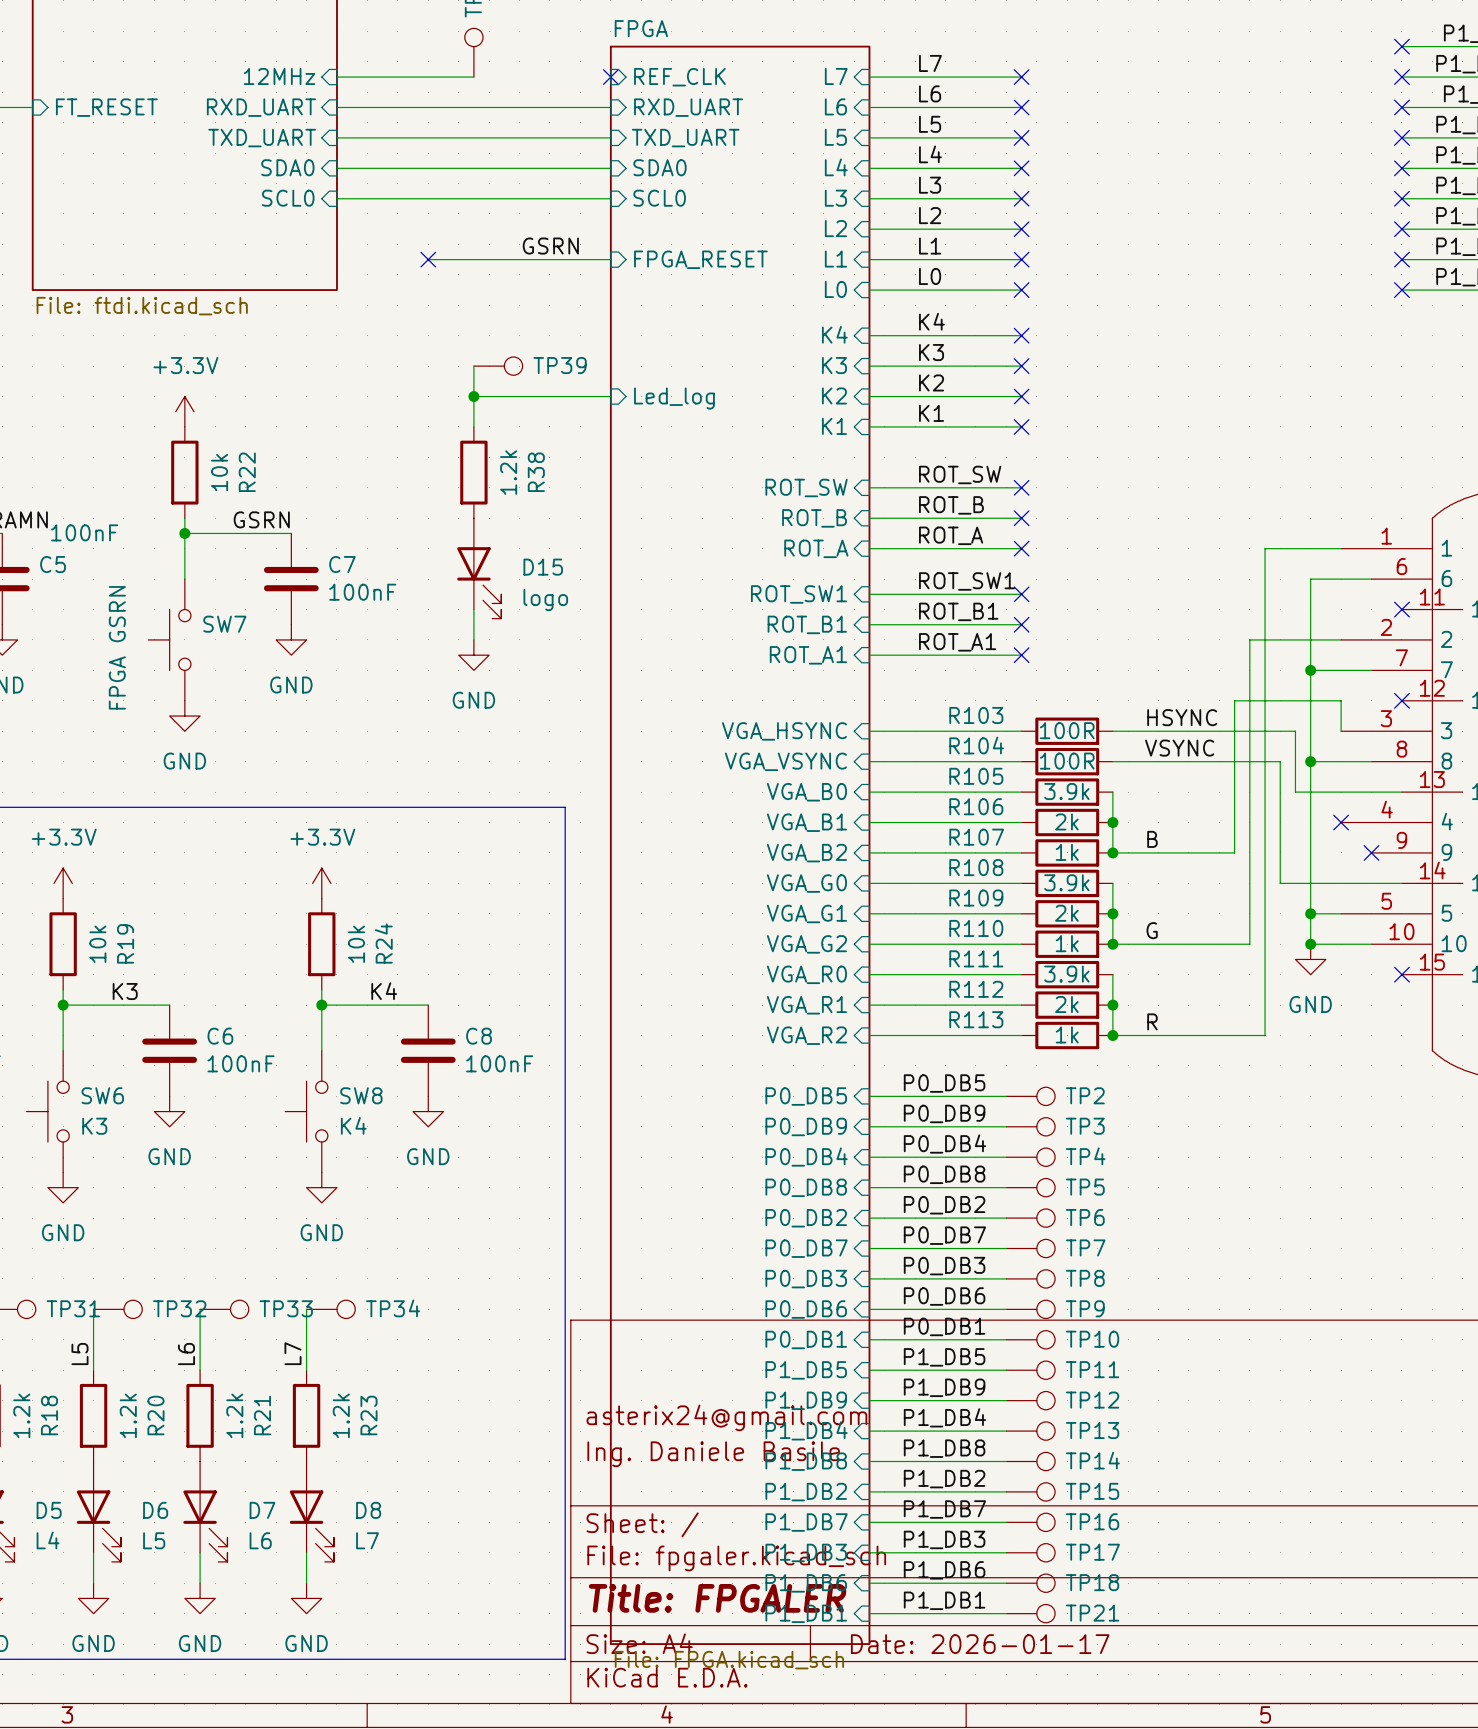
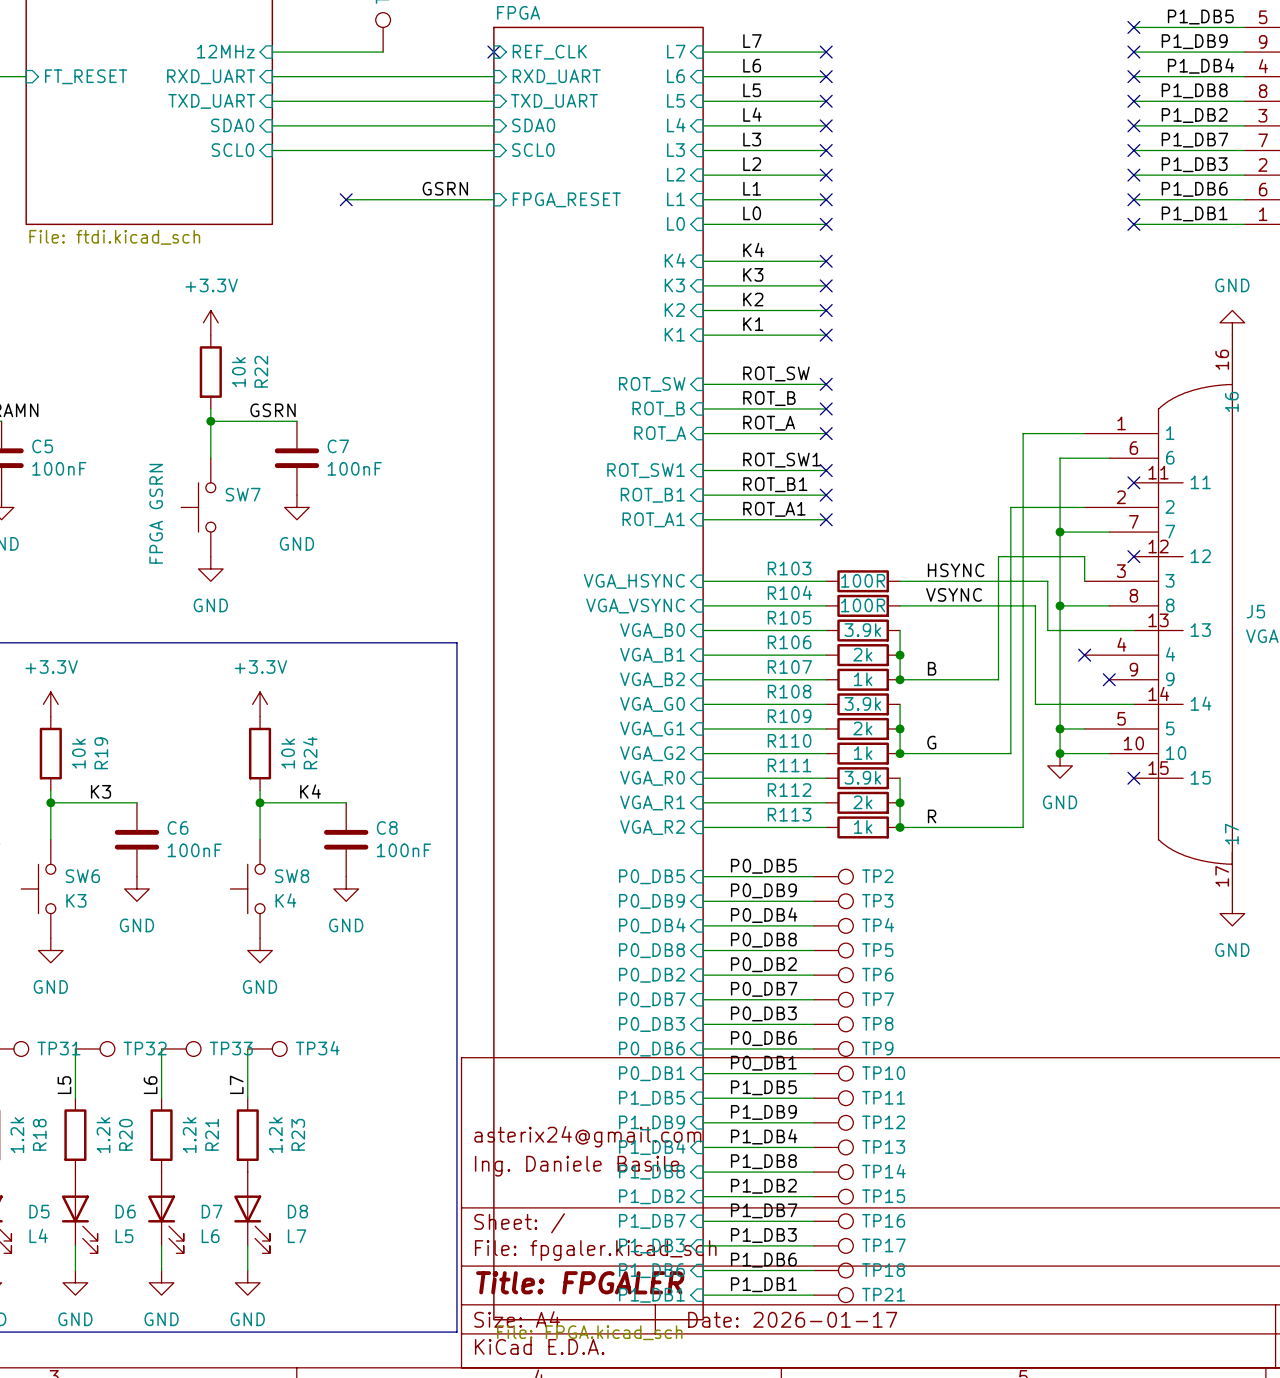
wire: (473, 366) (473, 426) -> none
TP39: (498, 366) -> none
wire: (473, 396) (610, 396) -> none
junction: (473, 396) -> none
sheet pin: Led_log (674, 398) -> none
power symbol position: +3.3V (184, 411) -> +3.3V (210, 322)
R22 position: (184, 472) -> (210, 372)
R38: 1.2k (473, 472) -> none
wire: (184, 518) (184, 579) -> (210, 408) (210, 458)
label position: GSRN (261, 519) -> GSRN (273, 410)
C5 value position: 100nF (84, 532) -> 100nF (59, 468)
wire: (184, 533) (260, 533) -> (235, 421) (296, 421)
junction: (184, 533) -> none
junction: none -> (210, 421)
D15: logo (479, 568) -> none
C7 position: (291, 579) -> (296, 458)
wire: (473, 609) (473, 639) -> none
SW7 position: (169, 639) -> (198, 507)
power symbol: GND (291, 639) -> none
power symbol: none -> GND (296, 507)
power symbol: GND (473, 655) -> none
power symbol: GND (184, 716) -> none
power symbol: none -> GND (210, 568)

